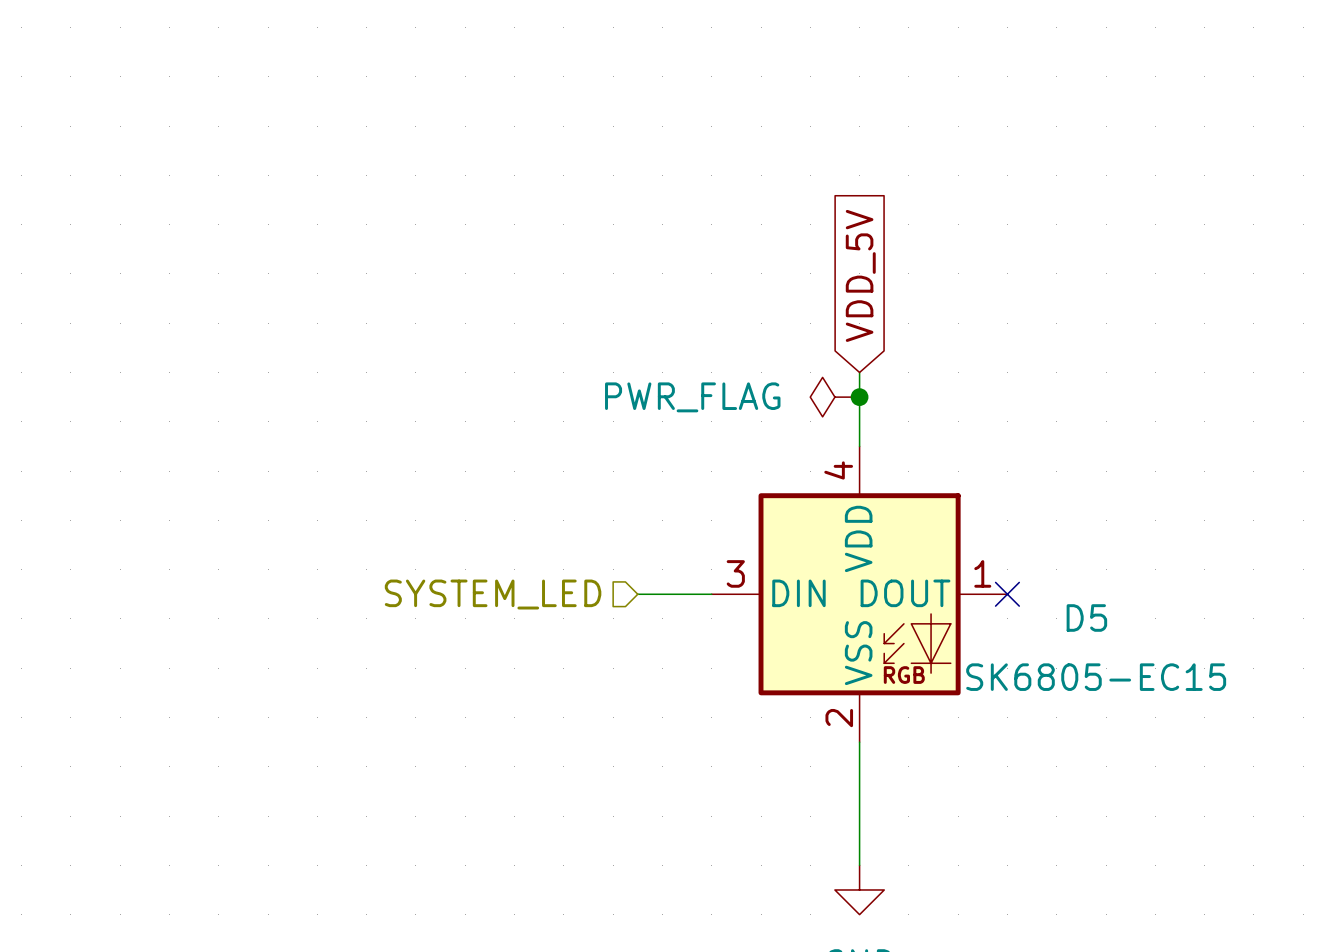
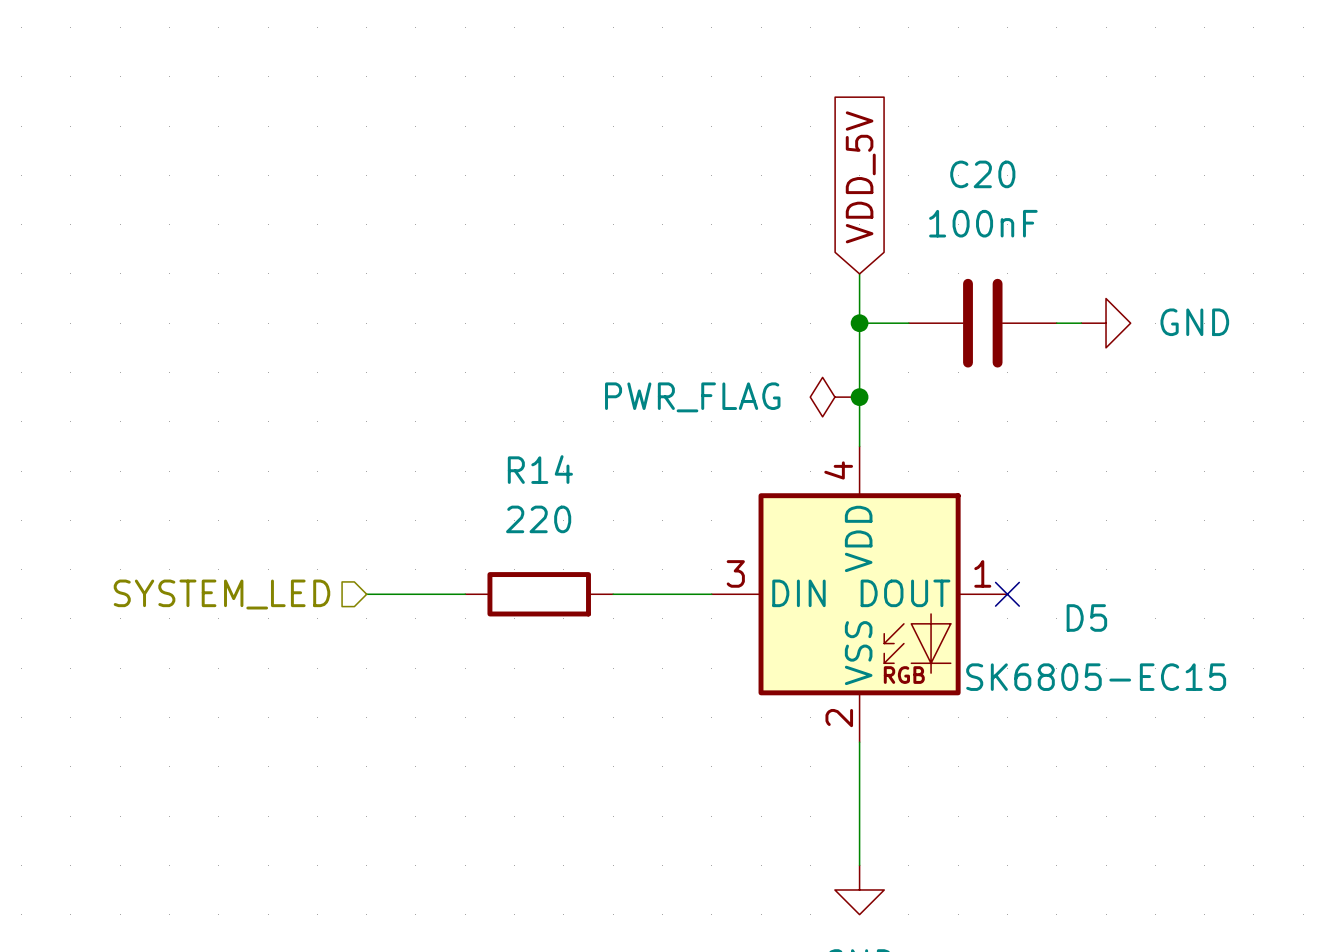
wire: none -> (859, 273) (859, 372)
global label position: VDD_5V (860, 275) -> VDD_5V (860, 177)
wire: none -> (859, 323) (908, 323)
junction: none -> (859, 323)
C20: none -> 100nF (982, 323)
wire: none -> (1056, 323) (1081, 323)
power symbol: none -> GND (1106, 323)
wire: none -> (366, 594) (465, 594)
hierarchical label position: SYSTEM_LED (493, 594) -> SYSTEM_LED (221, 594)
R14: none -> 220 (539, 594)
wire: none -> (613, 594) (637, 594)

